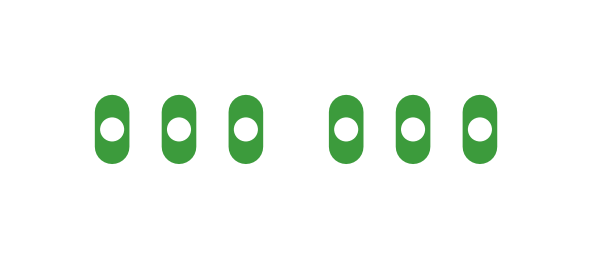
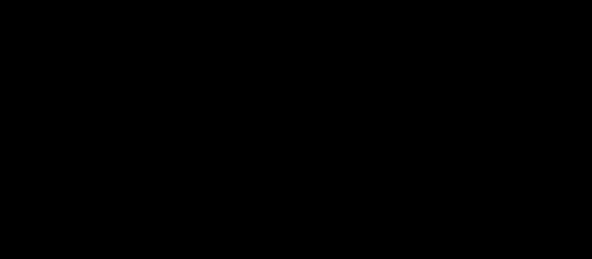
part: (179, 129) -> none
part: (413, 129) -> none

